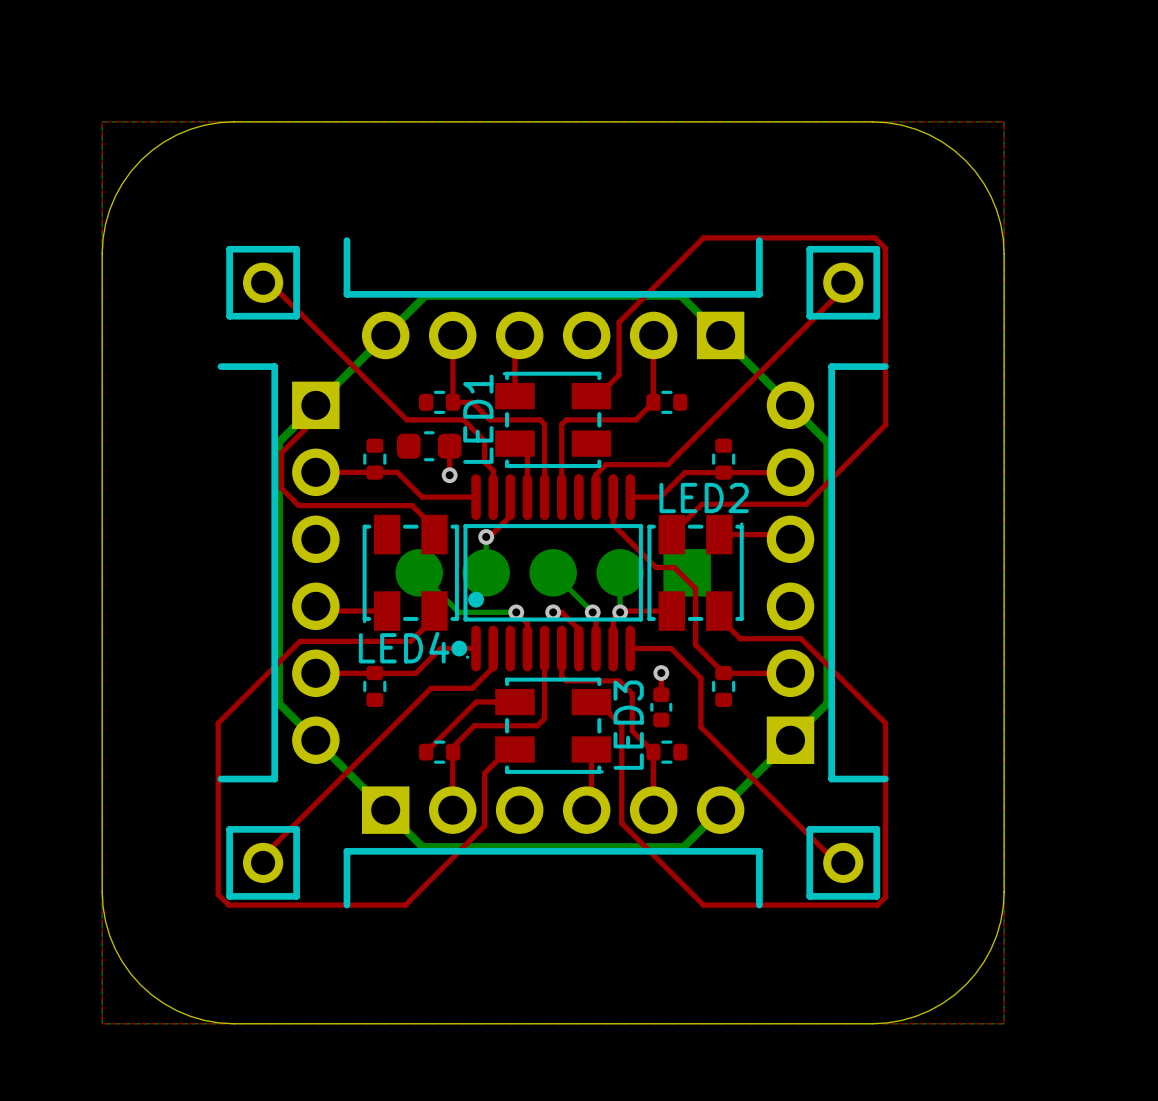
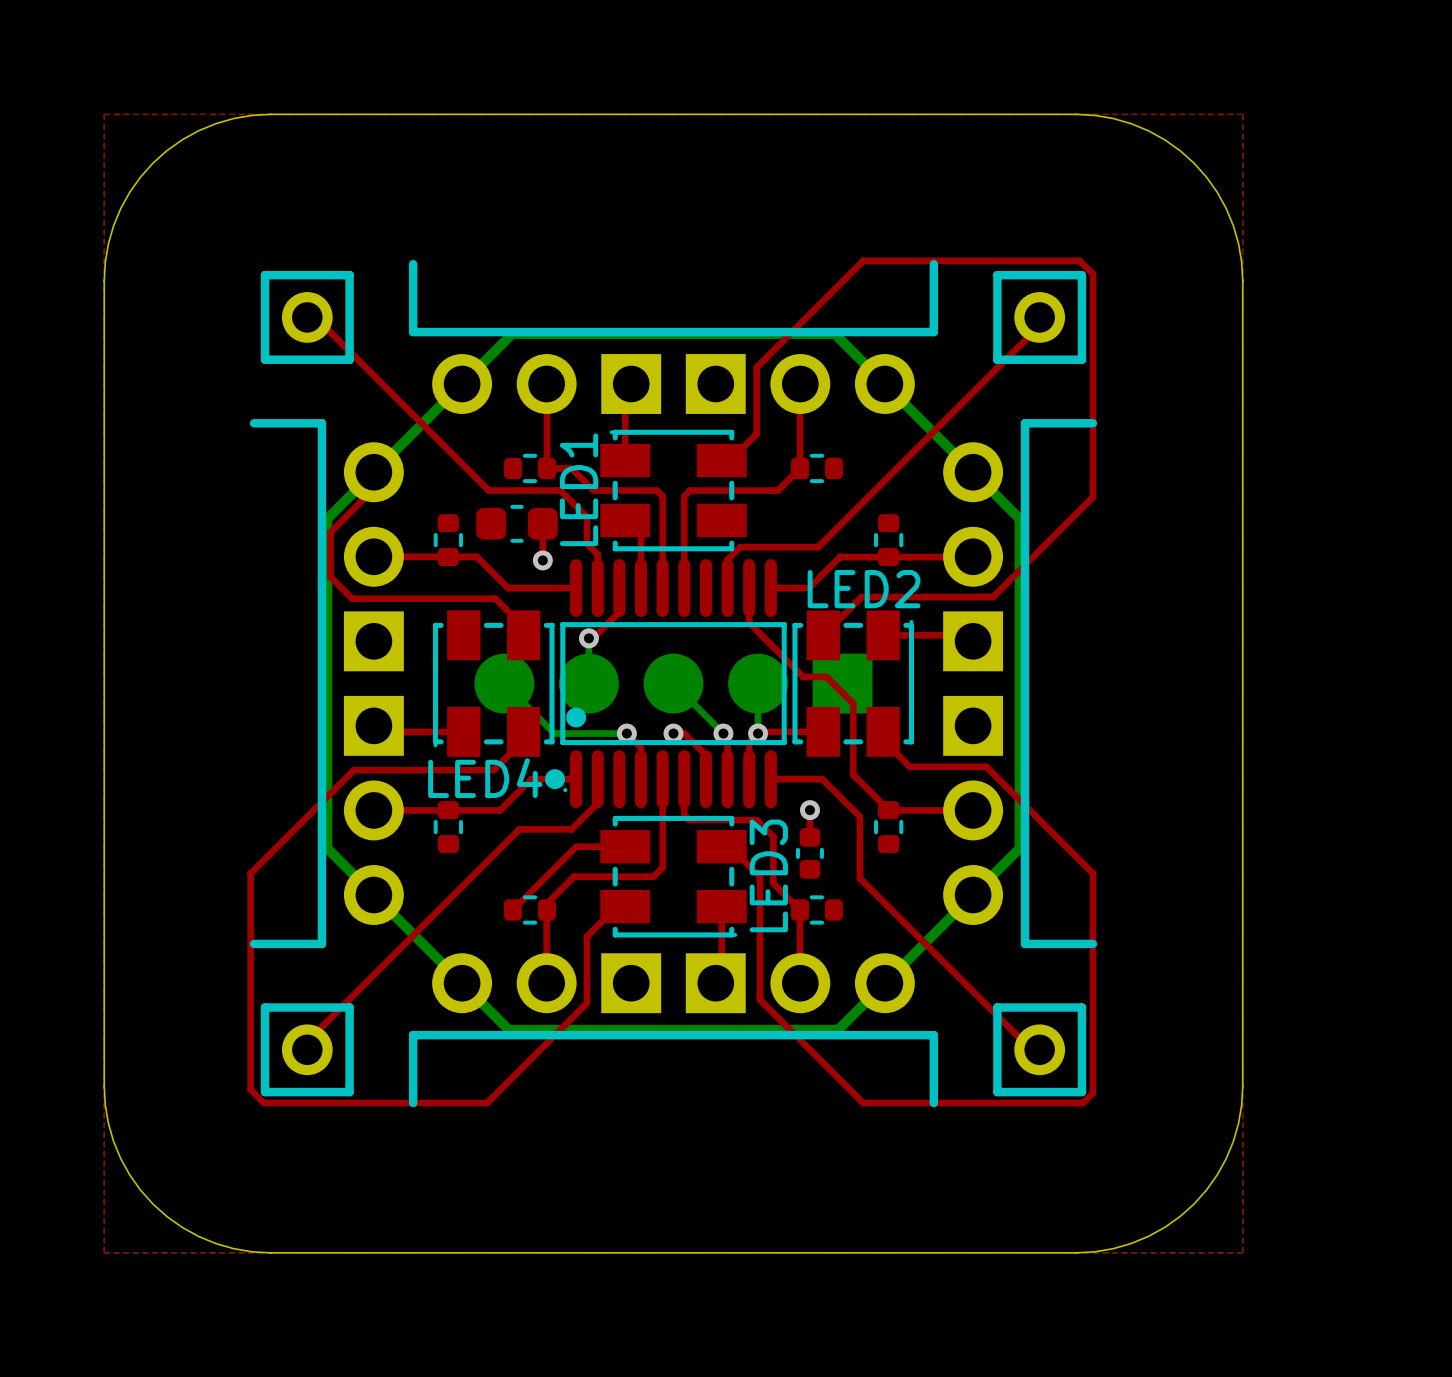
part footprint: [343, 237, 763, 360] -> [408, 259, 939, 414]
part footprint: [217, 363, 340, 783] -> [249, 419, 404, 949]
part footprint: [766, 363, 889, 783] -> [943, 419, 1098, 949]
part footprint: [343, 786, 763, 909] -> [408, 953, 939, 1108]

